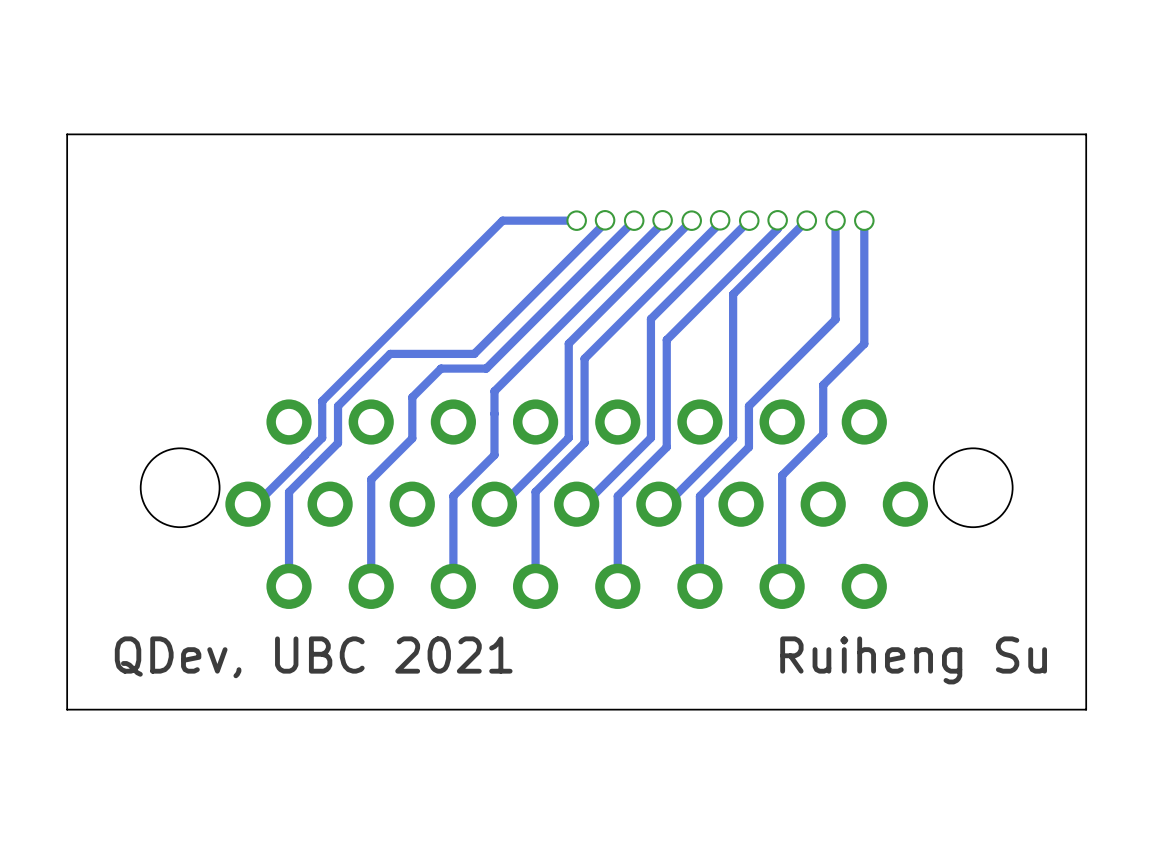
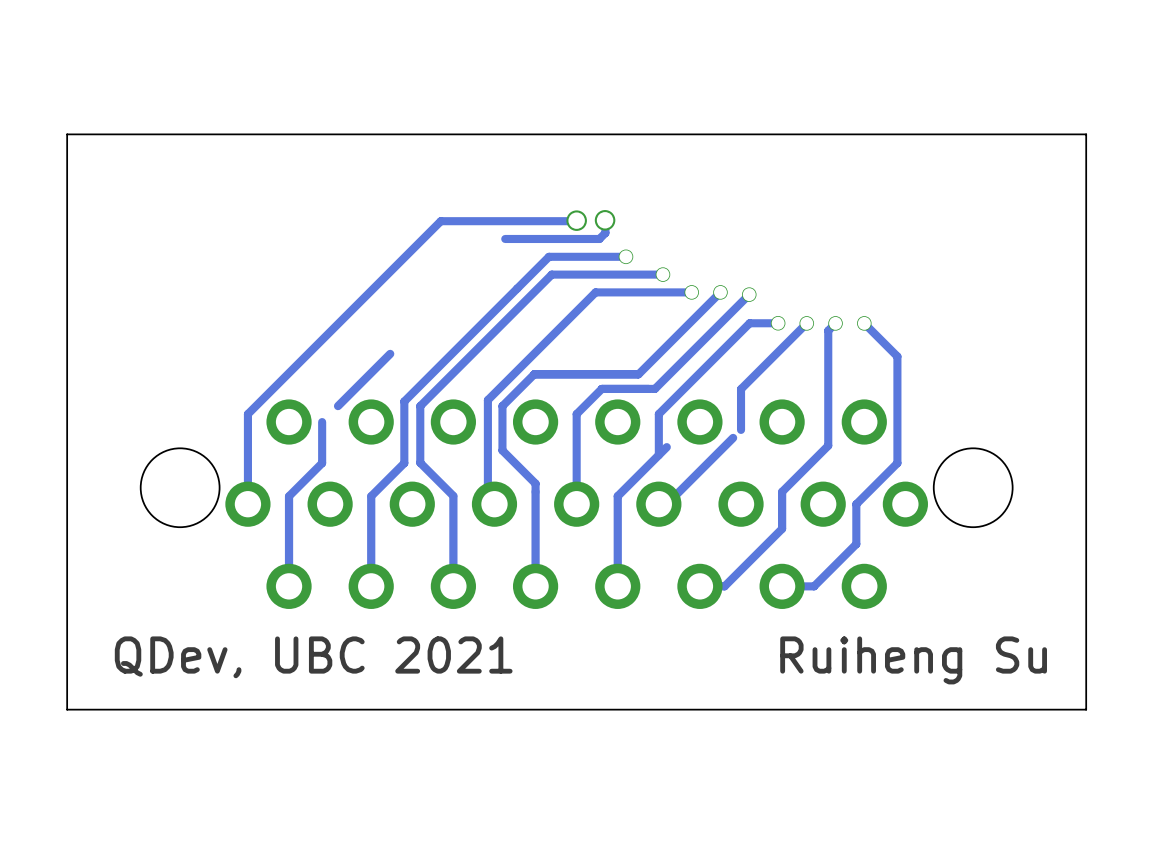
track: (576, 220) (502, 220) (322, 401) (322, 437) (256, 504) (247, 504) -> (576, 221) (440, 221) (247, 414) (247, 504)
track: (605, 220) (605, 223) (474, 353) (390, 353) -> none
track: (634, 220) (486, 368) (441, 368) (412, 397) (412, 438) (371, 479) (371, 496) -> (625, 256) (548, 256) (404, 401) (404, 463) (371, 496)
via: (634, 220) -> none
track: (662, 220) (662, 223) (494, 391) (494, 455) (453, 496) -> (662, 274) (551, 274) (420, 406) (420, 462) (453, 495)
via: (662, 220) -> none
track: (691, 220) (568, 343) (568, 437) (502, 504) (494, 504) -> none
via: (691, 220) -> none
track: (720, 220) (720, 223) (584, 358) (584, 442) (535, 491) -> (720, 292) (638, 374) (534, 374) (502, 406) (502, 450) (535, 483) (535, 491)
via: (720, 220) -> none
track: (749, 220) (650, 318) (650, 437) (584, 504) (576, 504) -> (749, 294) (654, 388) (601, 388) (576, 414) (576, 504)
via: (749, 220) -> none
track: (777, 220) (777, 229) (666, 339) (666, 447) -> none
via: (777, 220) -> none
track: (806, 220) (733, 294) (733, 437) -> none
via: (806, 220) -> none
track: (835, 220) (835, 319) (748, 406) (748, 447) (699, 496) (699, 586) -> none
via: (835, 220) -> none
track: (864, 220) (864, 343) (823, 385) (823, 434) (782, 475) (782, 491) -> (835, 323) (828, 330) (828, 445) (782, 491)
via: (864, 220) -> none
track: none -> (605, 228) (605, 232) (599, 238) (505, 238)
via: none -> (625, 256)
via: none -> (662, 274)
track: none -> (691, 292) (595, 292) (487, 400) (487, 497)
via: none -> (691, 292)
via: none -> (720, 292)
via: none -> (749, 294)
track: none -> (778, 323) (749, 323) (658, 414) (658, 455)
via: none -> (778, 323)
track: none -> (806, 323) (741, 389) (741, 429)
via: none -> (806, 323)
via: none -> (835, 323)
track: none -> (864, 323) (897, 356) (897, 463) (856, 504) (856, 544) (814, 586) (782, 586)
via: none -> (864, 323)
track: (338, 406) (338, 443) (289, 492) (289, 496) -> (322, 422) (322, 463) (289, 496)
track: (782, 528) (782, 586) -> (782, 528) (724, 586) (699, 586)

